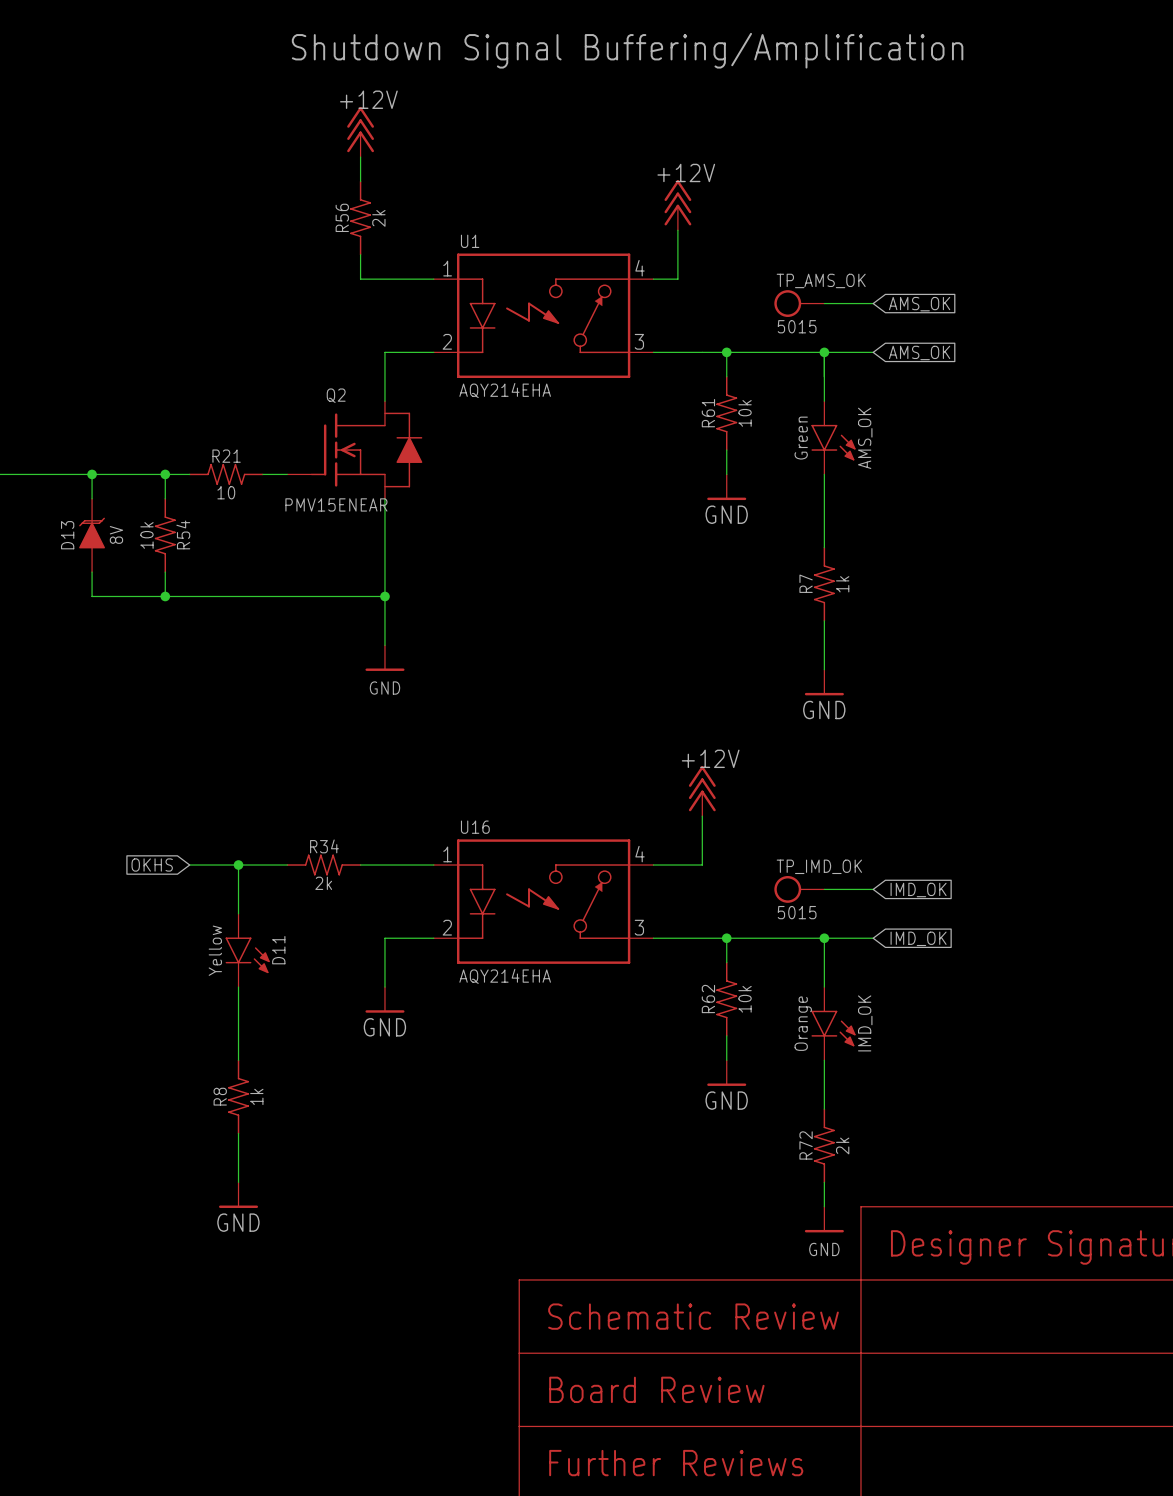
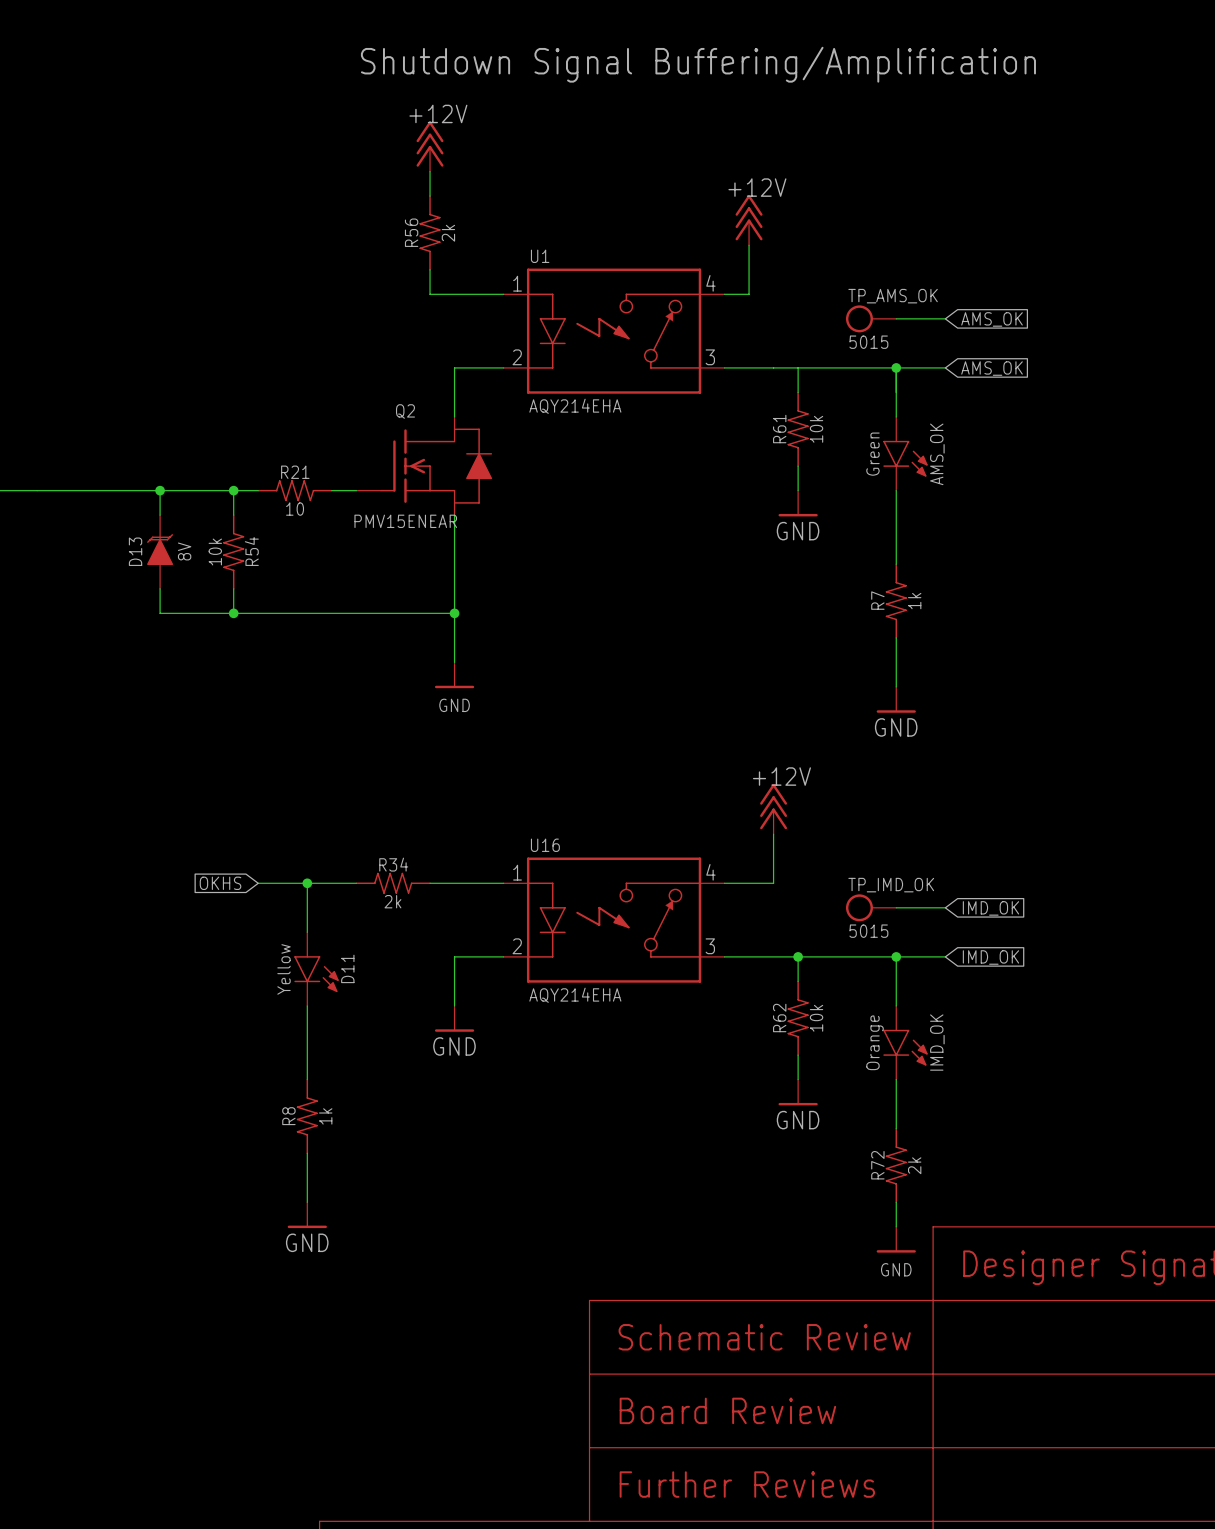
junction: (726, 352) -> none

